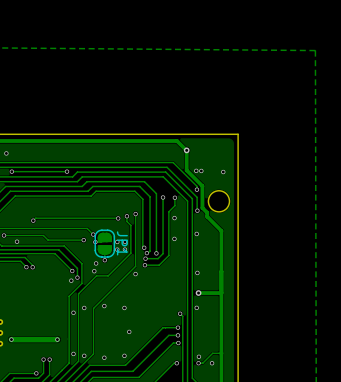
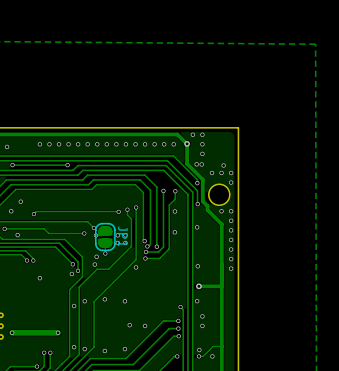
via: none -> (192, 134)
via: none -> (202, 134)
via: none -> (39, 144)
via: none -> (49, 144)
via: none -> (59, 144)
via: none -> (68, 144)
via: none -> (78, 144)
via: none -> (87, 144)
via: none -> (97, 144)
via: none -> (106, 144)
via: none -> (116, 144)
via: none -> (125, 144)
via: none -> (135, 144)
via: none -> (145, 144)
via: none -> (154, 144)
via: none -> (164, 144)
via: none -> (173, 144)
via: none -> (202, 144)
via: none -> (202, 153)
via: none -> (211, 173)
via: none -> (221, 173)
via: none -> (231, 173)
via: none -> (231, 182)
via: none -> (20, 201)
via: none -> (11, 211)
via: none -> (221, 211)
via: none -> (231, 211)
via: none -> (231, 220)
via: none -> (231, 230)
via: none -> (231, 239)
via: none -> (231, 249)
via: none -> (231, 259)
via: none -> (231, 268)
via: none -> (39, 278)
via: none -> (202, 316)
via: none -> (145, 325)
via: none -> (202, 325)

